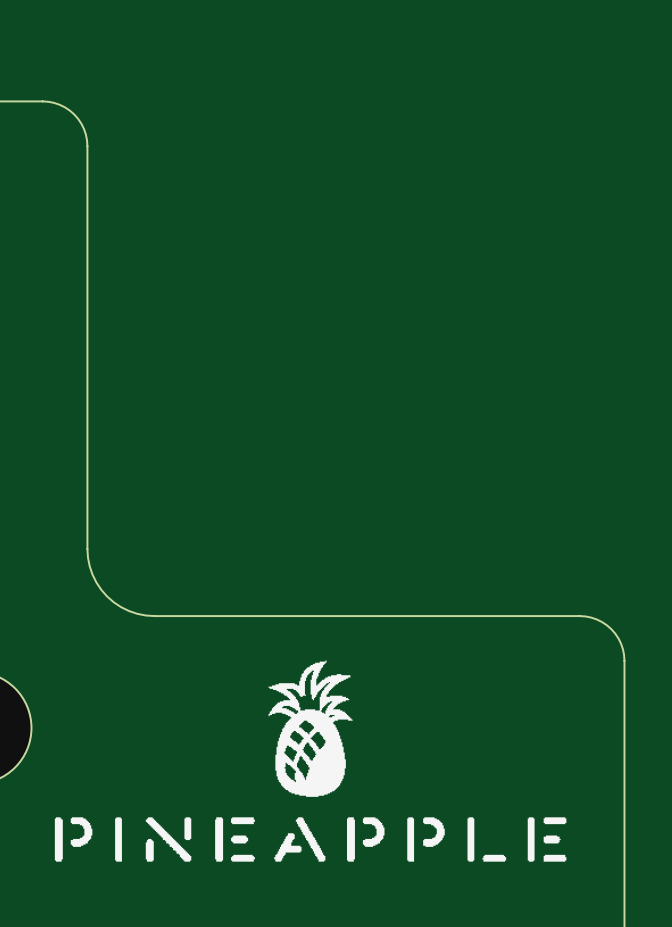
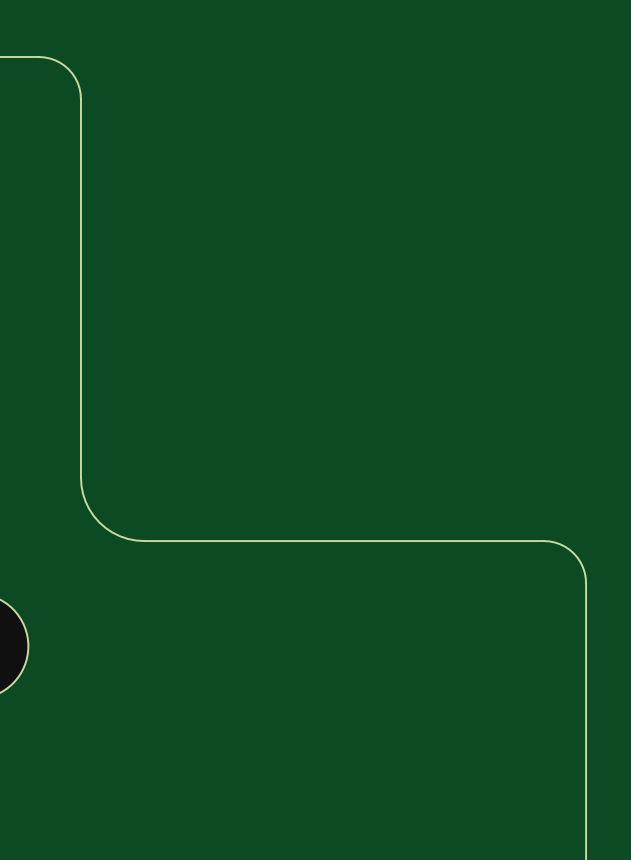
drawing: [54, 660, 567, 862] -> none

